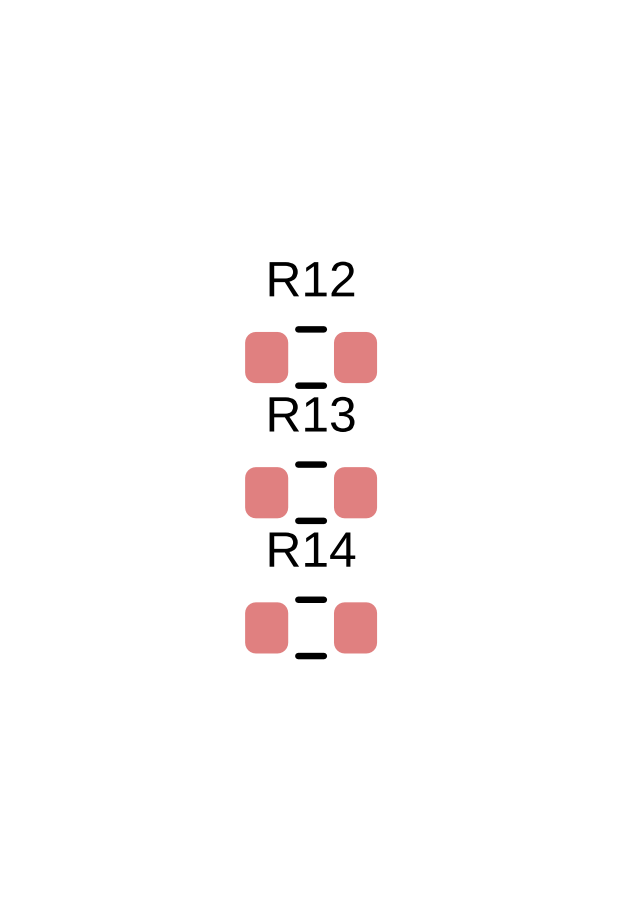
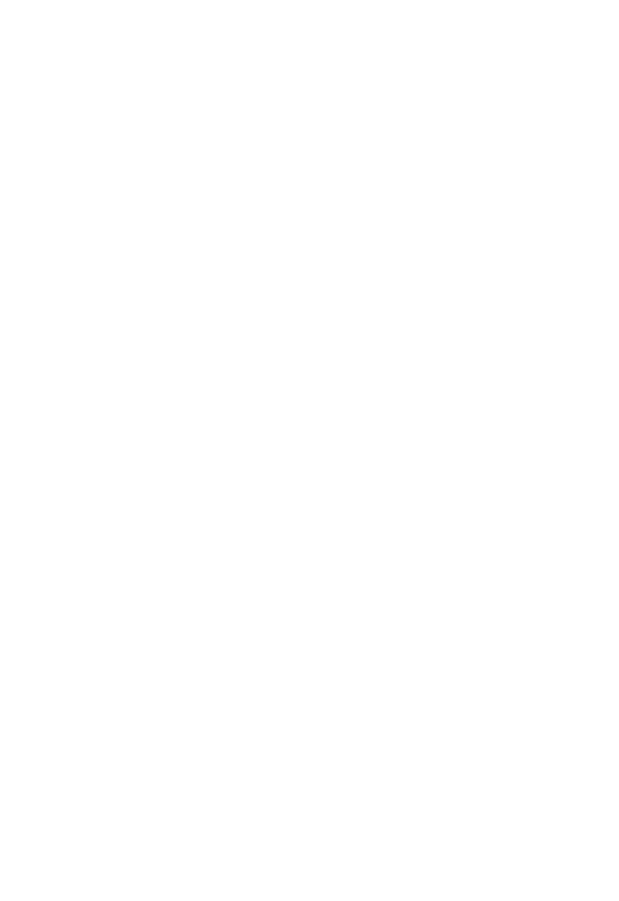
R12: (311, 357) -> none
R13: (311, 492) -> none
R14: (311, 627) -> none

